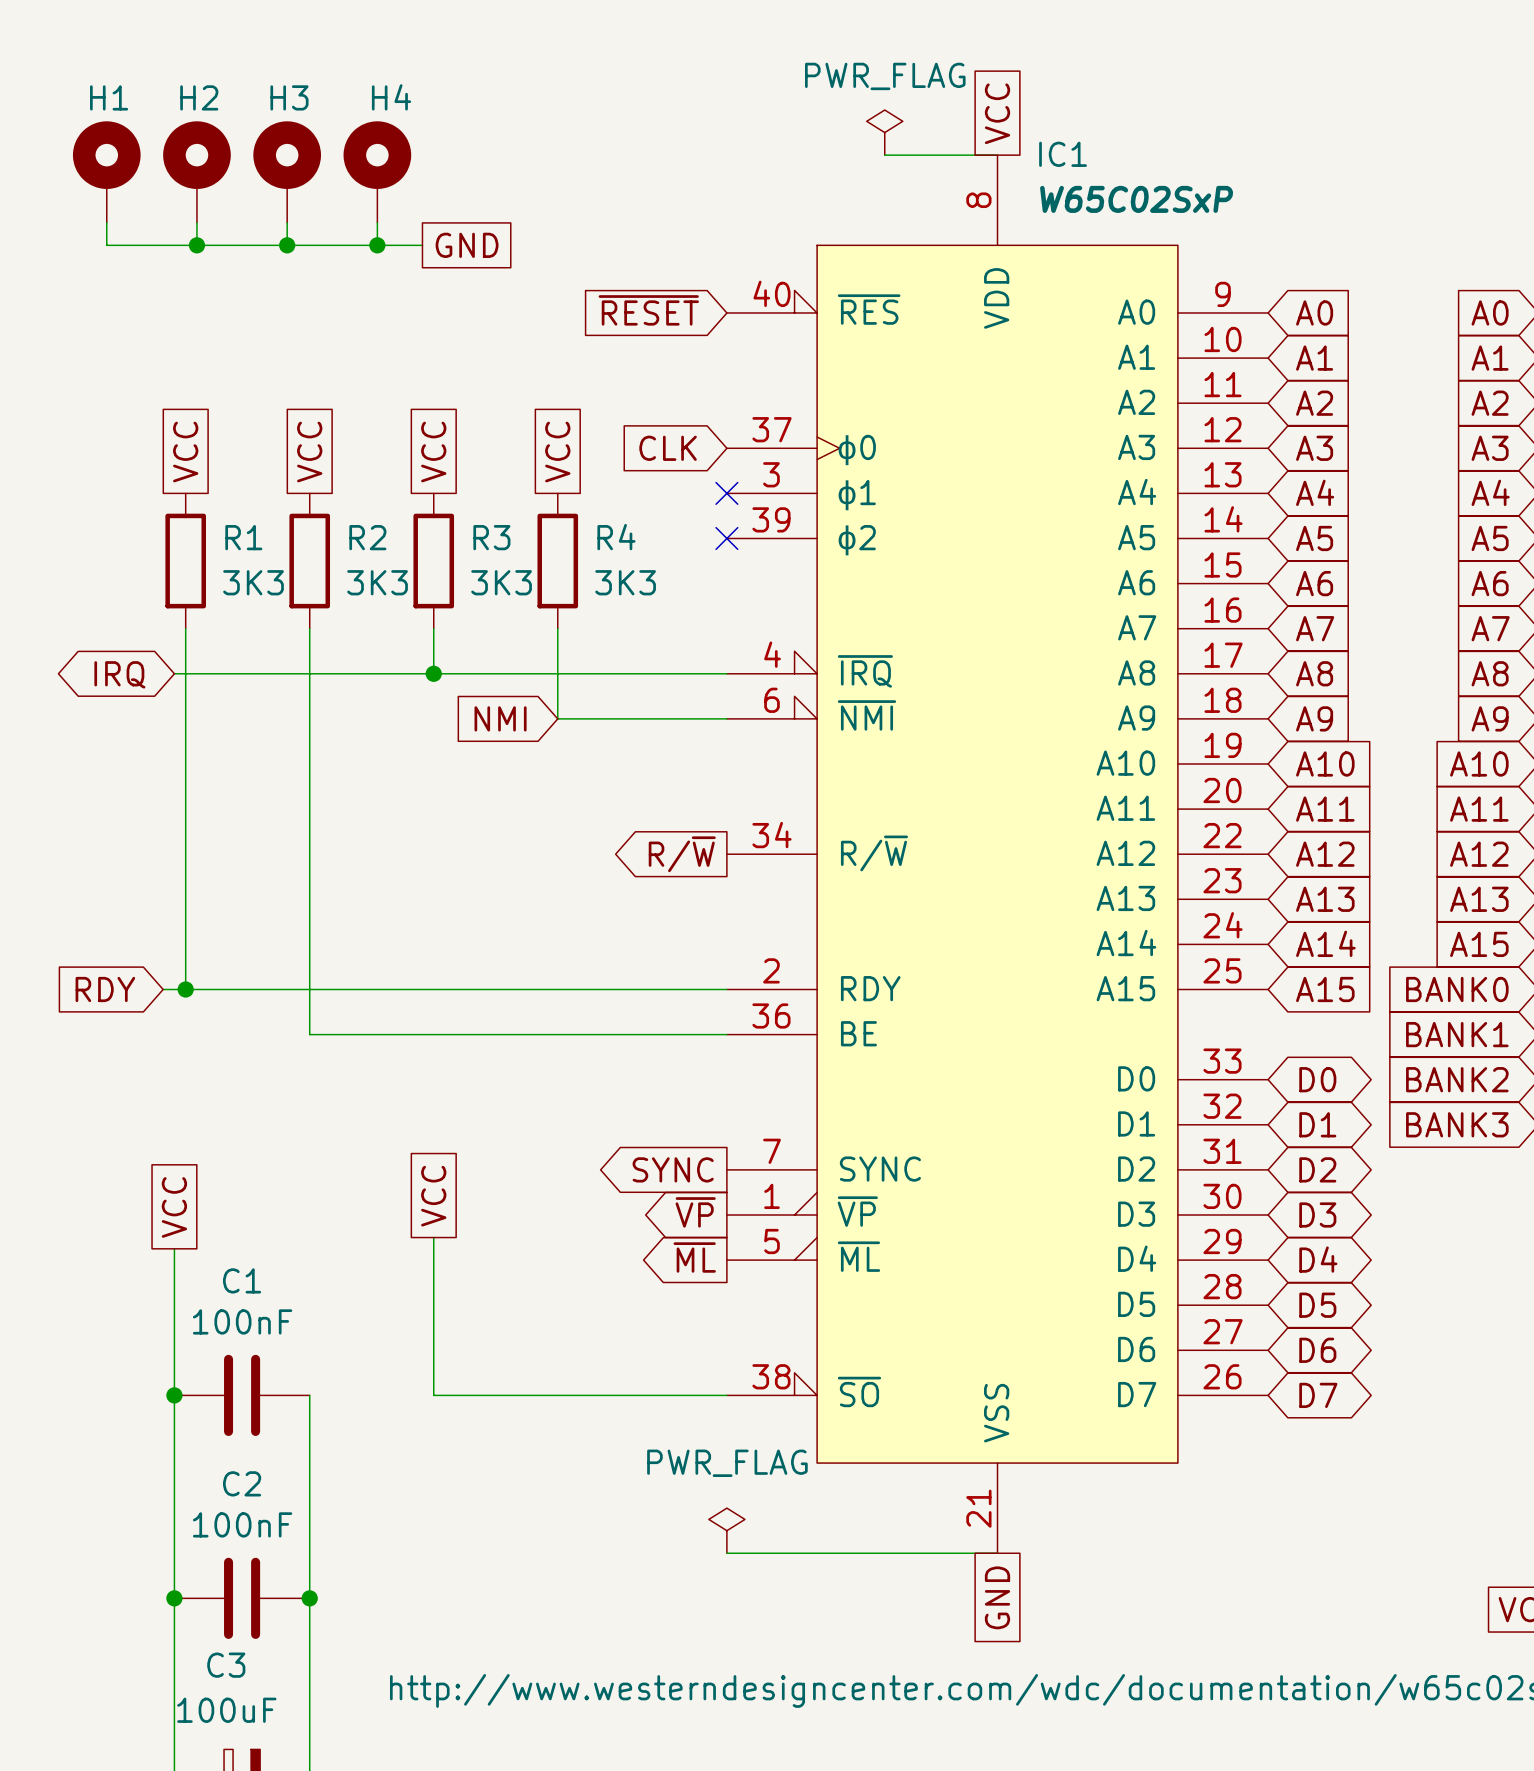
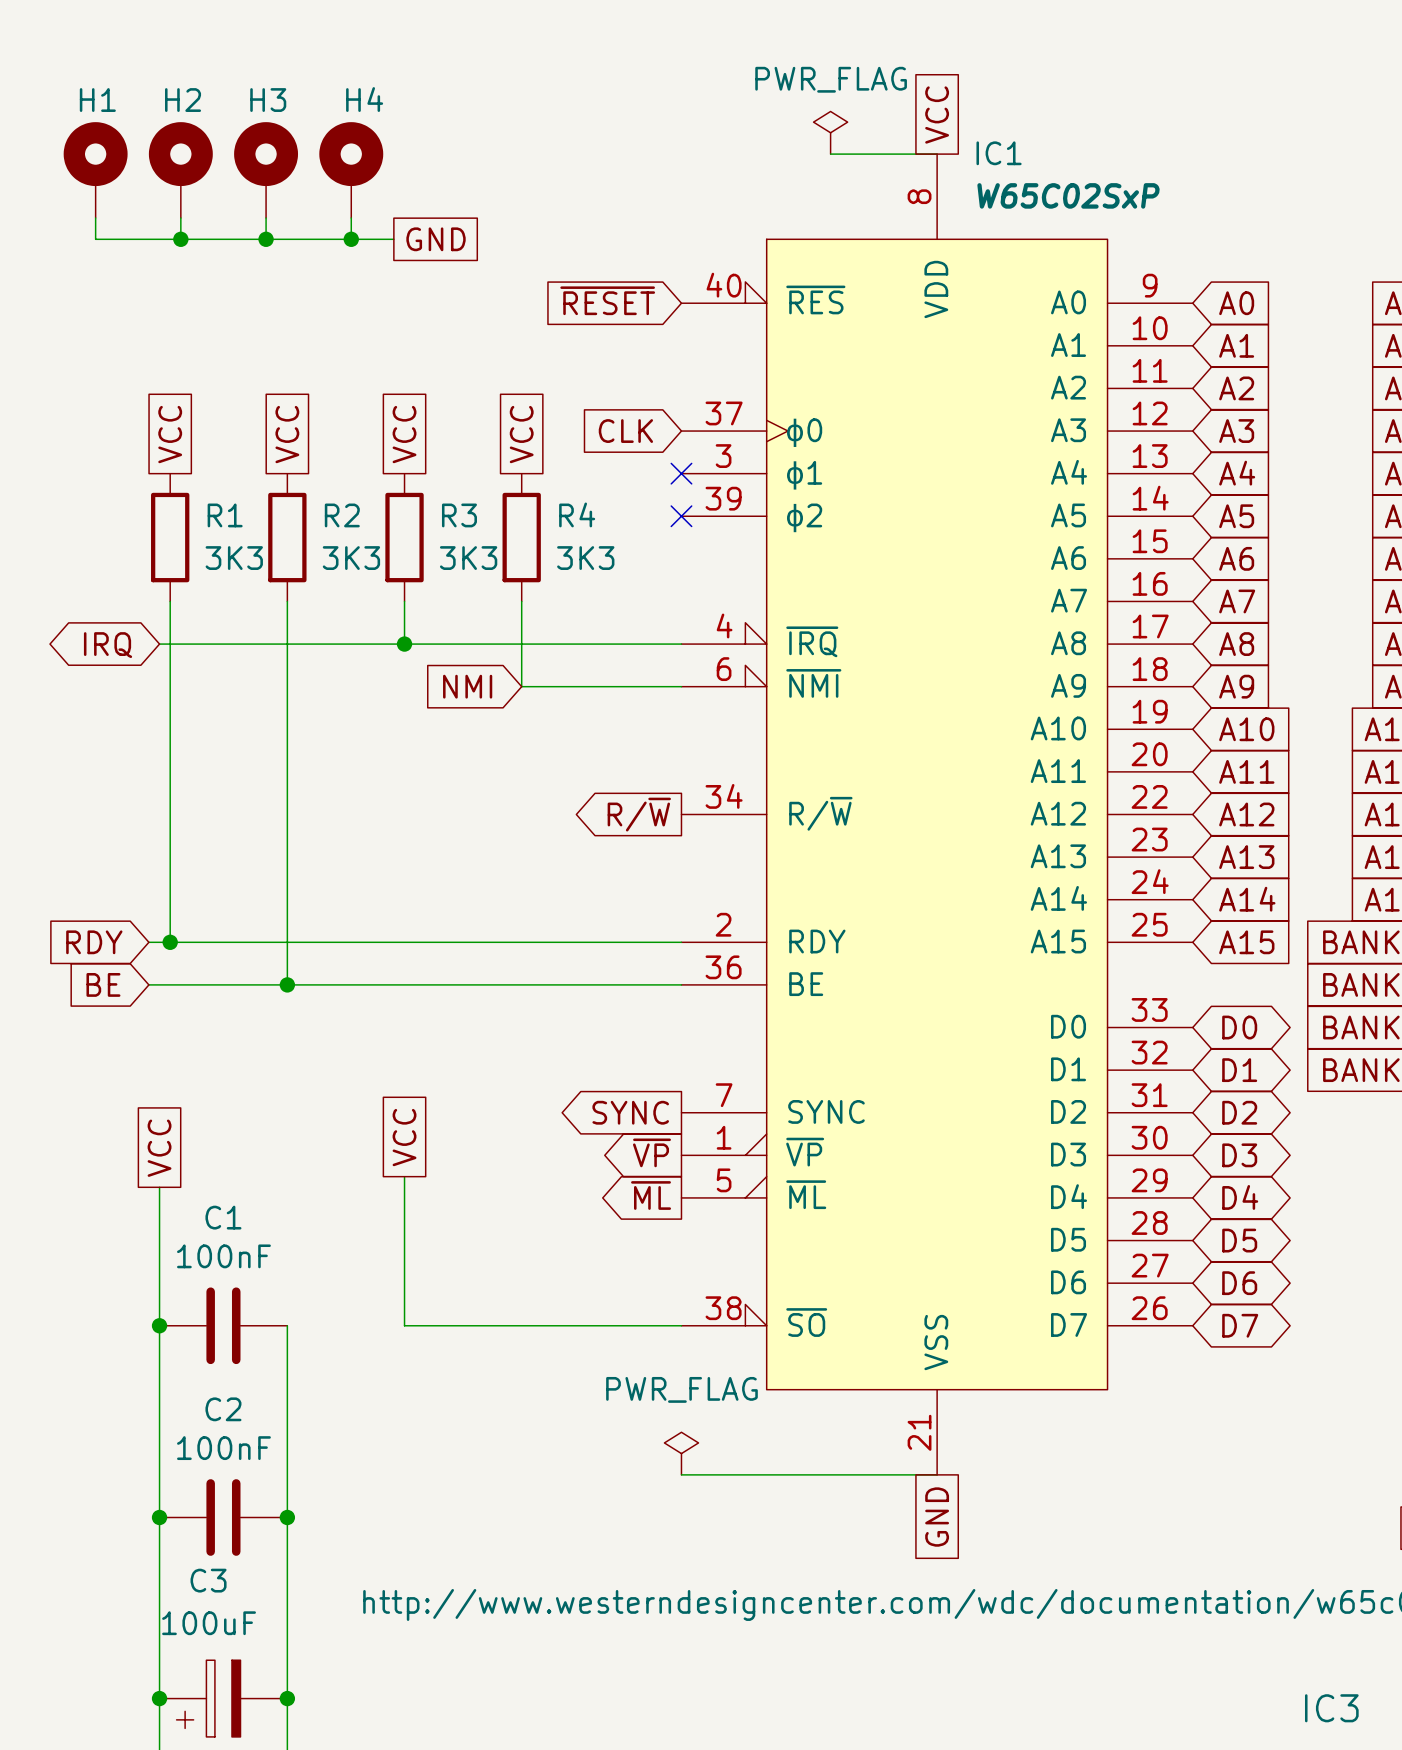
global label: none -> BE (103, 984)
wire: none -> (148, 984) (287, 984)
junction: none -> (287, 984)

